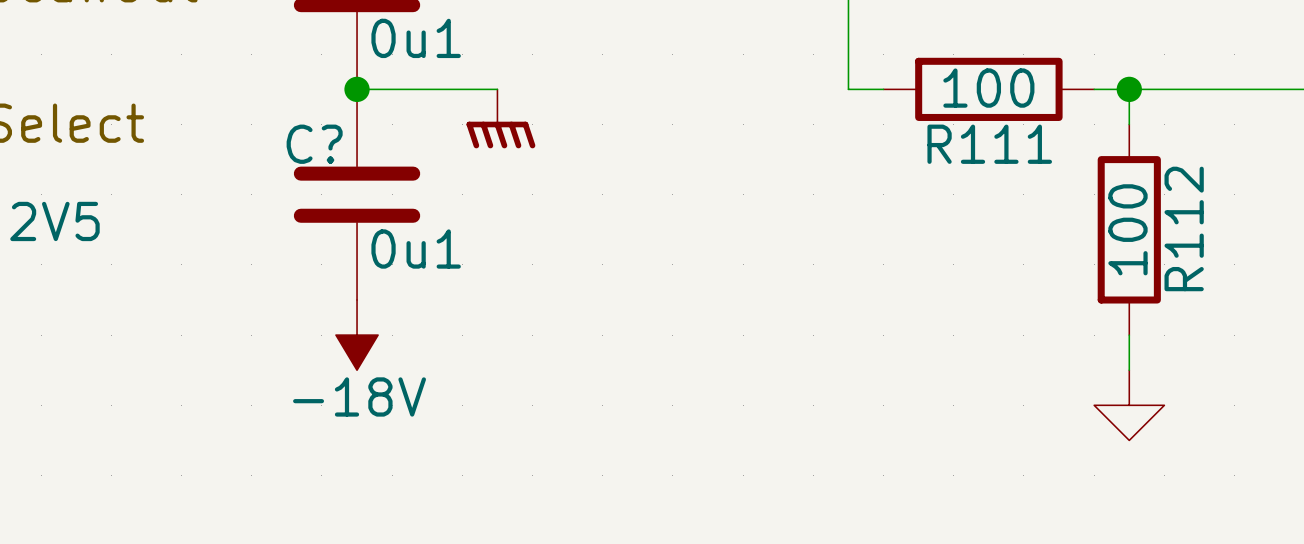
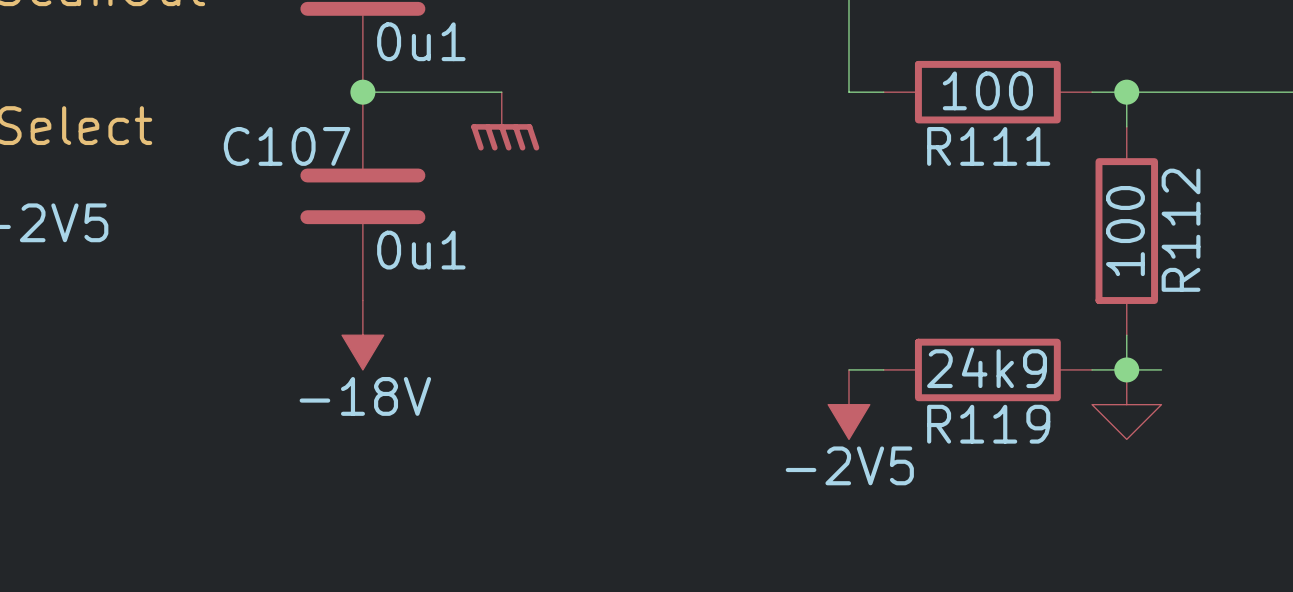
C? name: C? (314, 144) -> C107 (287, 146)
wire: none -> (848, 369) (883, 369)
R119: none -> 24k9 (987, 369)
wire: none -> (1092, 369) (1161, 369)
junction: none -> (1126, 369)
power symbol: none -> -2V5 (848, 404)

